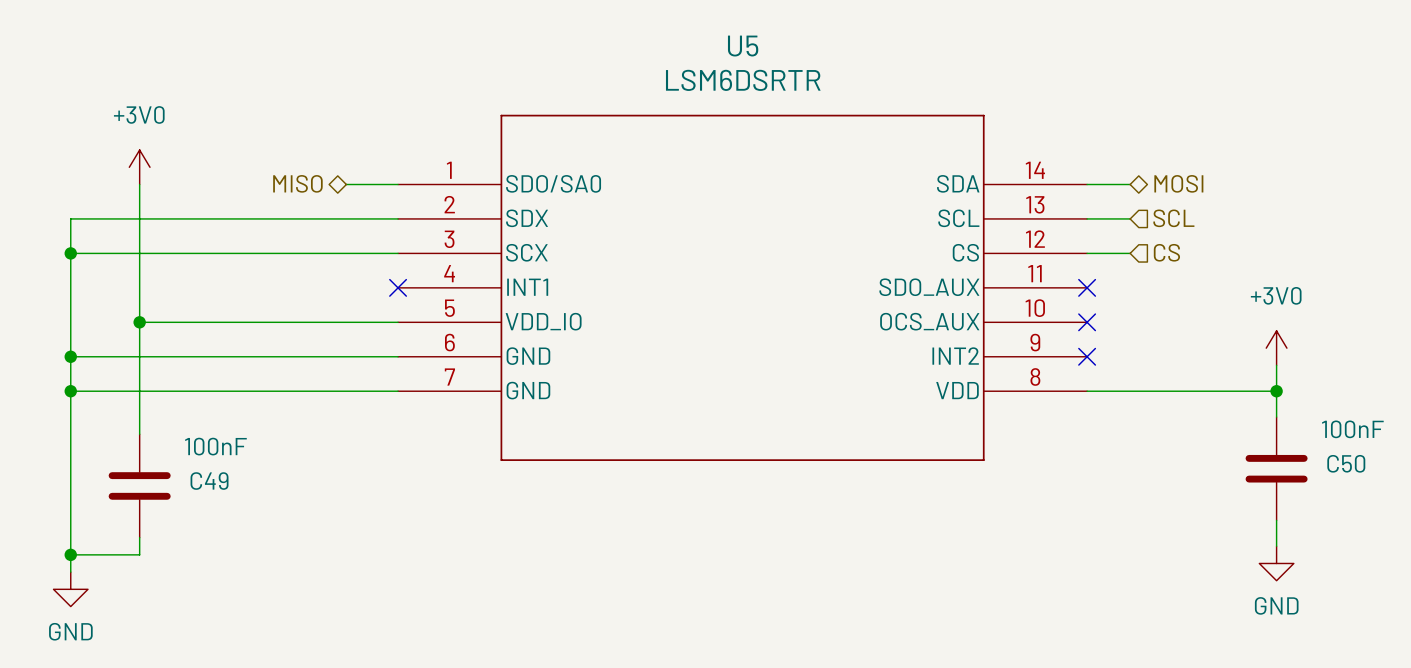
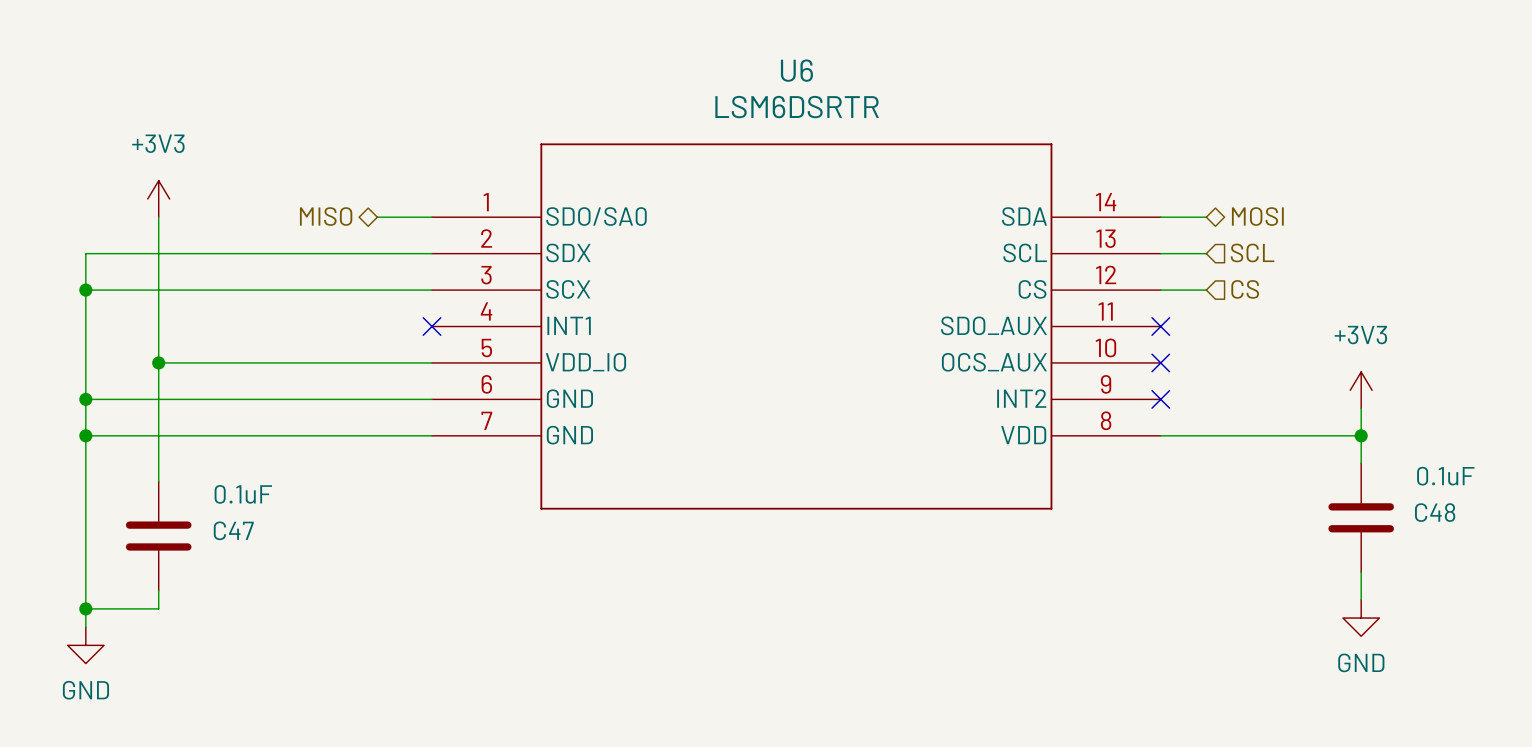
U5 name: U5 (743, 46) -> U6 (796, 70)
power symbol: +3V0 (139, 167) -> +3V3 (158, 198)
power symbol: +3V0 (1276, 348) -> +3V3 (1361, 390)
C50 value: 100nF (1352, 429) -> 0.1uF (1445, 476)
C49 value: 100nF (215, 446) -> 0.1uF (243, 494)
C50 name: C50 (1346, 463) -> C48 (1435, 512)
C49 name: C49 (209, 481) -> C47 (233, 530)

